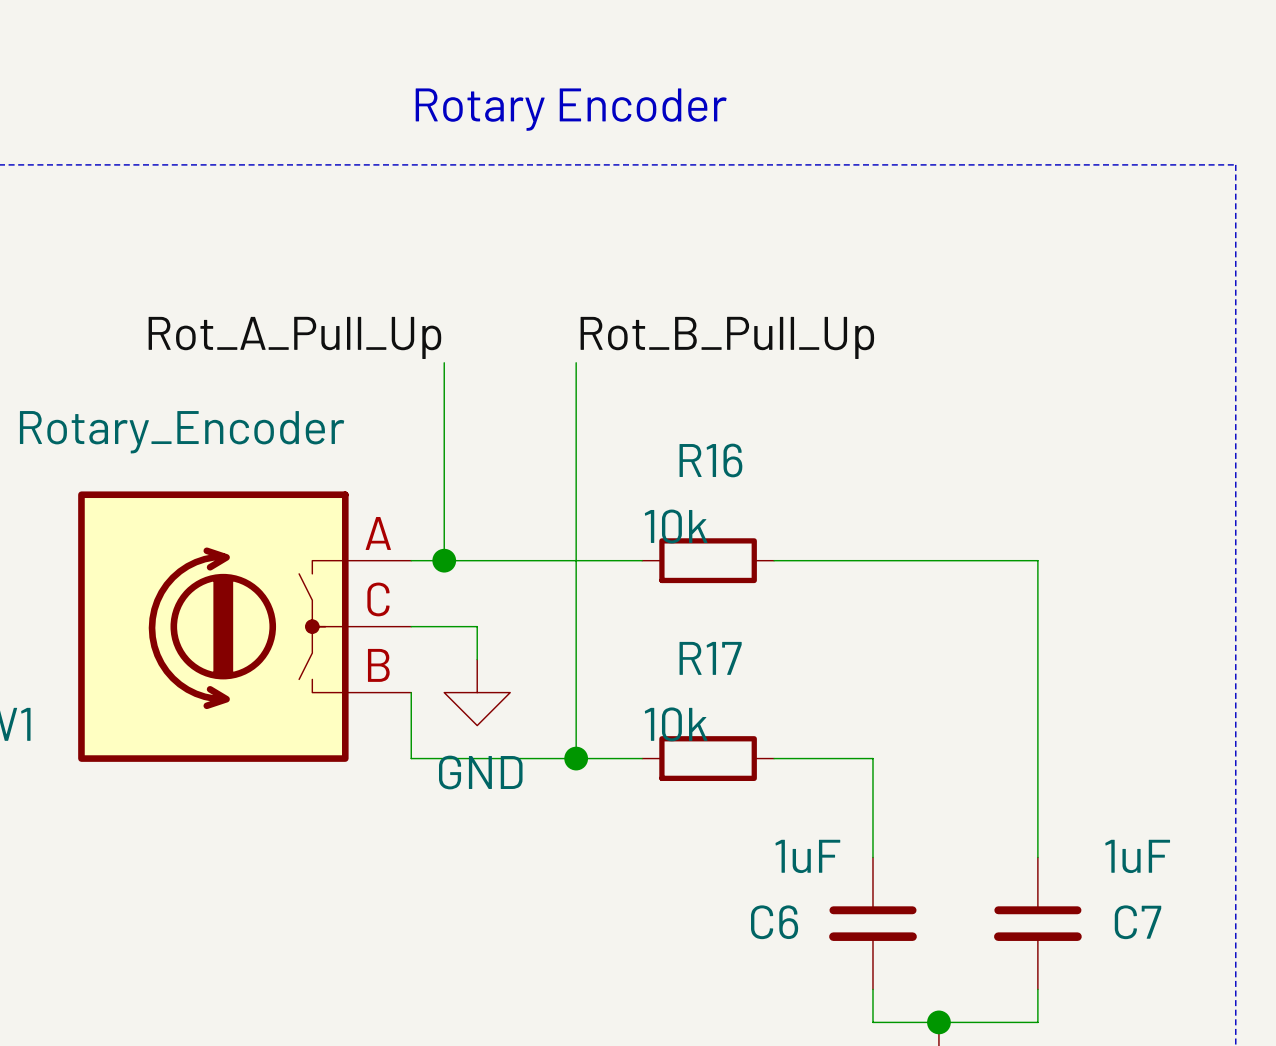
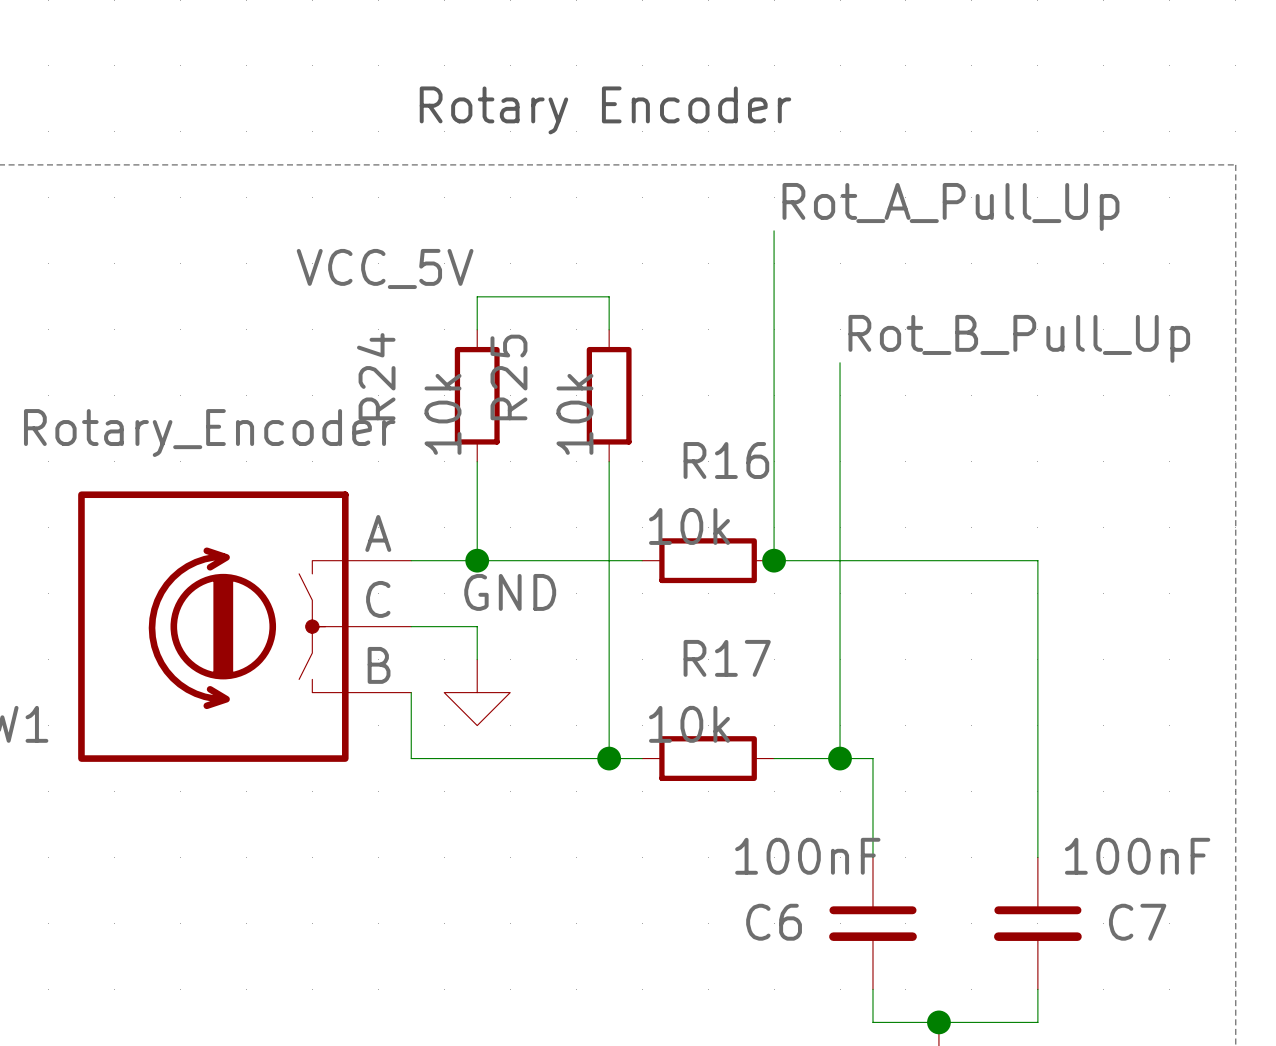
wire: none -> (774, 230) (774, 560)
label: none -> VCC_5V (385, 268)
wire: none -> (477, 329) (477, 296) (609, 296) (609, 329)
label position: Rot_A_Pull_Up (294, 337) -> Rot_A_Pull_Up (950, 206)
label position: Rot_B_Pull_Up (727, 337) -> Rot_B_Pull_Up (1019, 338)
wire: (444, 362) (444, 560) -> none
wire: (576, 362) (576, 758) -> (840, 362) (840, 758)
R24: none -> 10k (477, 395)
R25: none -> 10k (609, 395)
wire: none -> (477, 461) (477, 560)
wire: none -> (609, 461) (609, 758)
junction position: (444, 560) -> (477, 560)
junction: none -> (774, 560)
junction position: (576, 758) -> (609, 758)
junction: none -> (840, 758)
power symbol text position: GND (480, 772) -> GND (510, 592)
C6 value: 1uF (807, 856) -> 100nF (807, 856)
C7 value: 1uF (1137, 856) -> 100nF (1137, 856)

